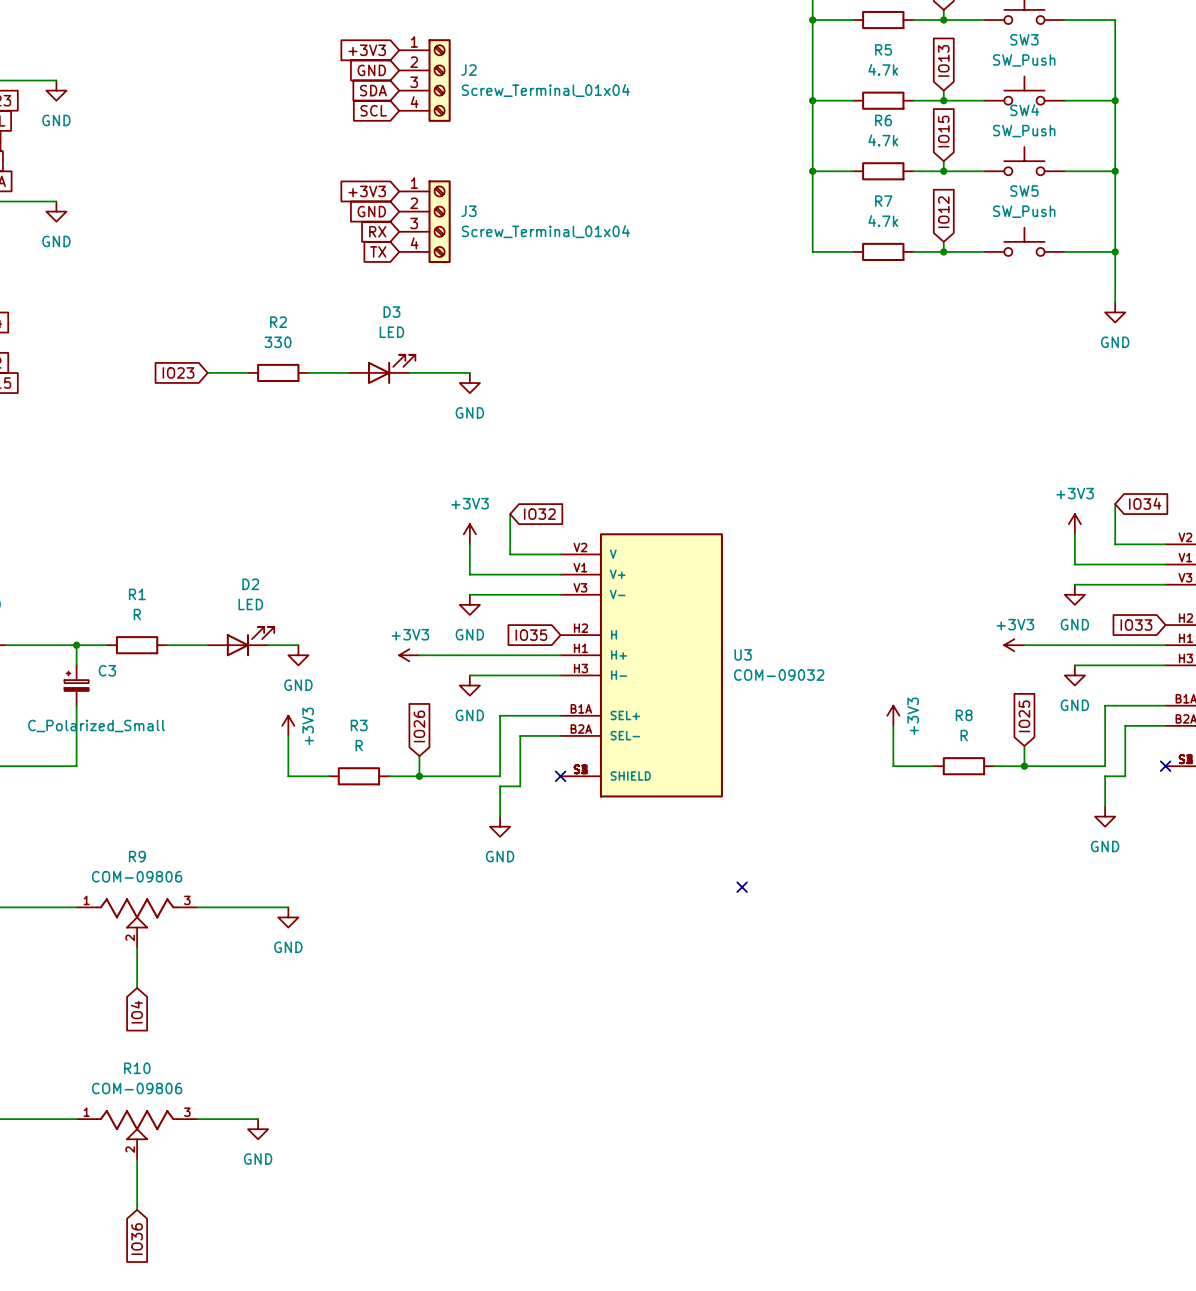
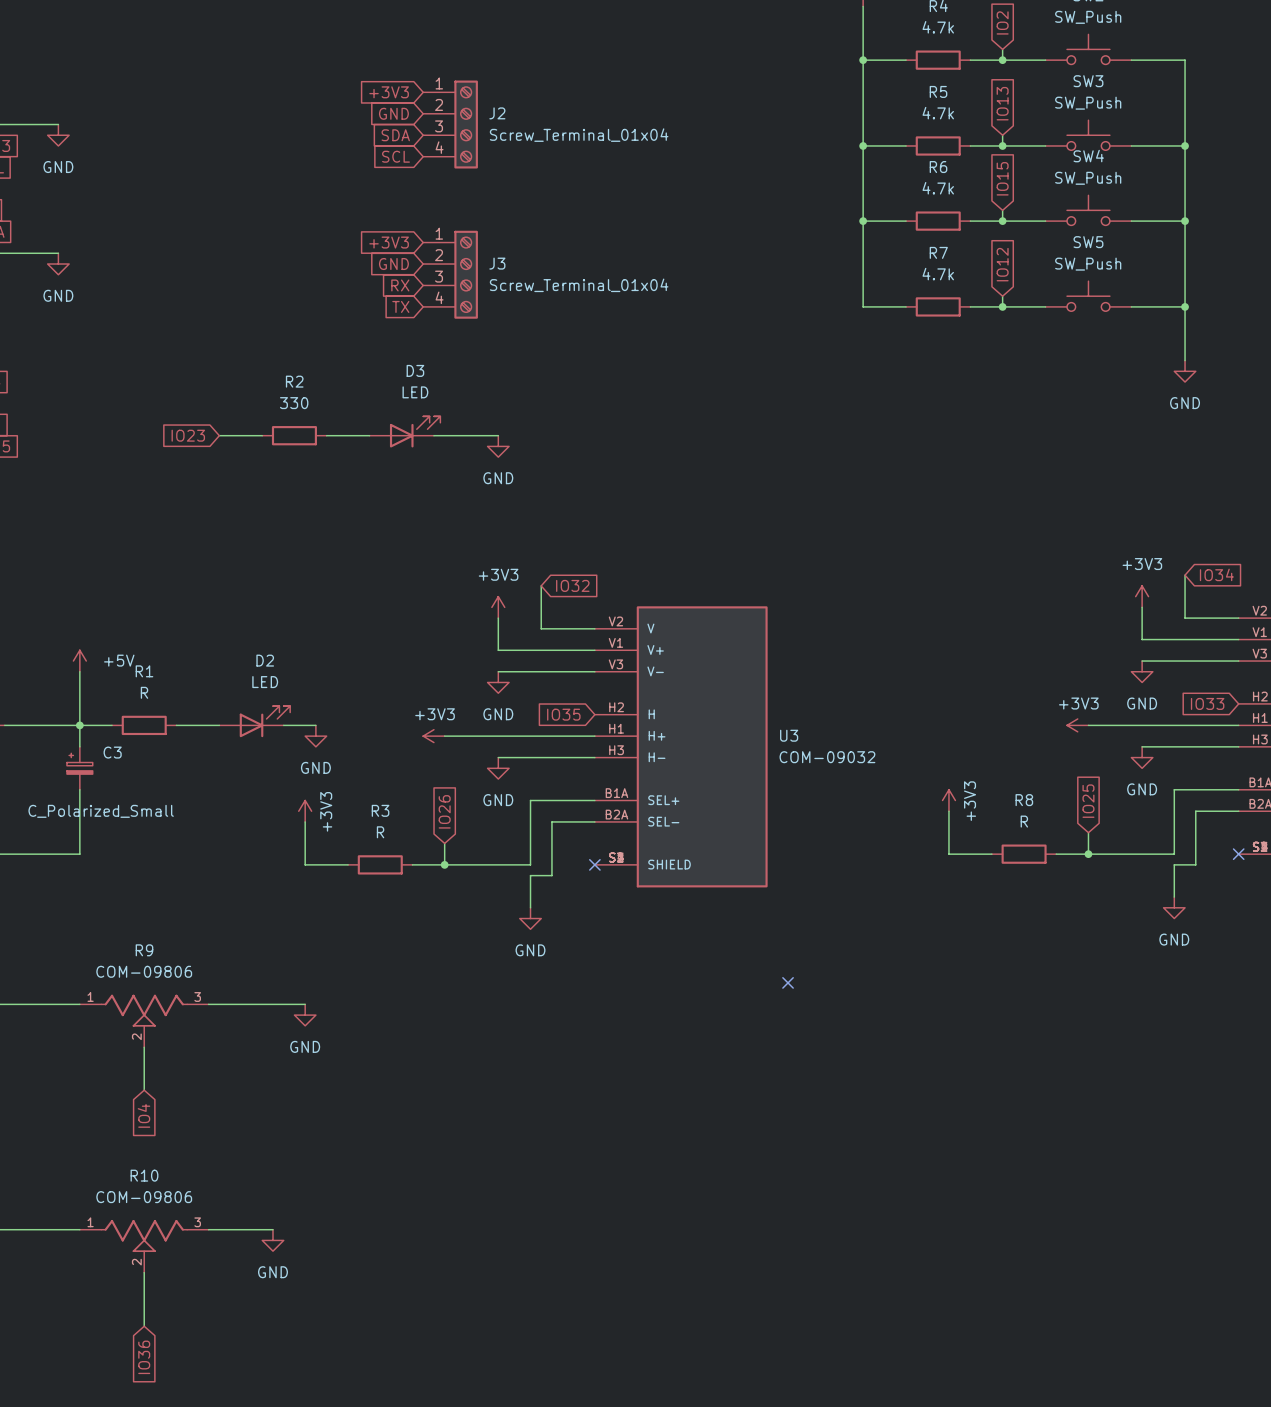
power symbol: none -> +5V (79, 661)
wire: none -> (79, 671) (79, 725)

